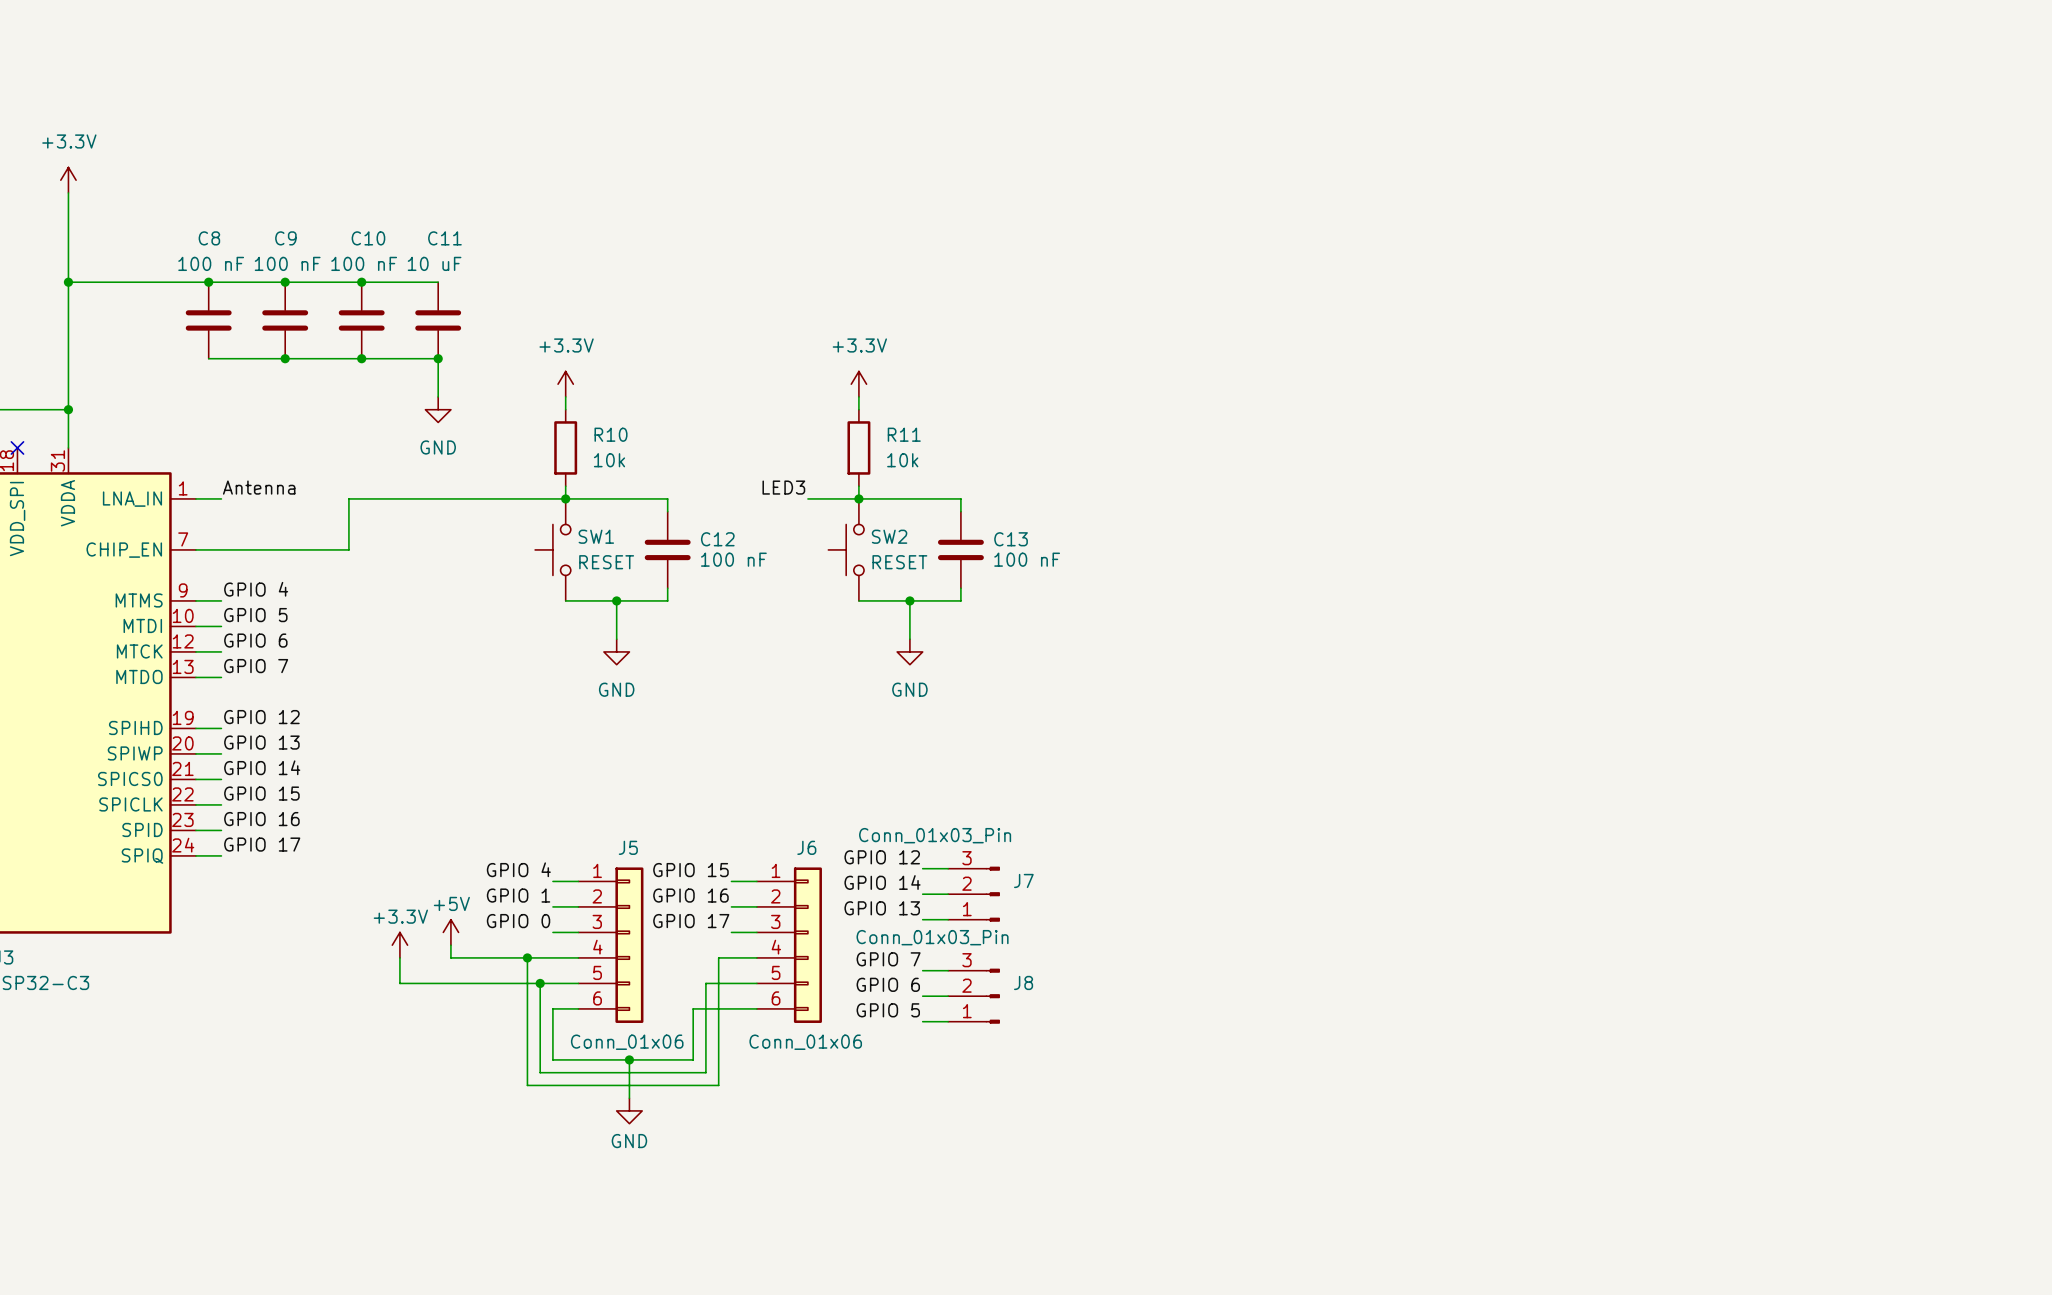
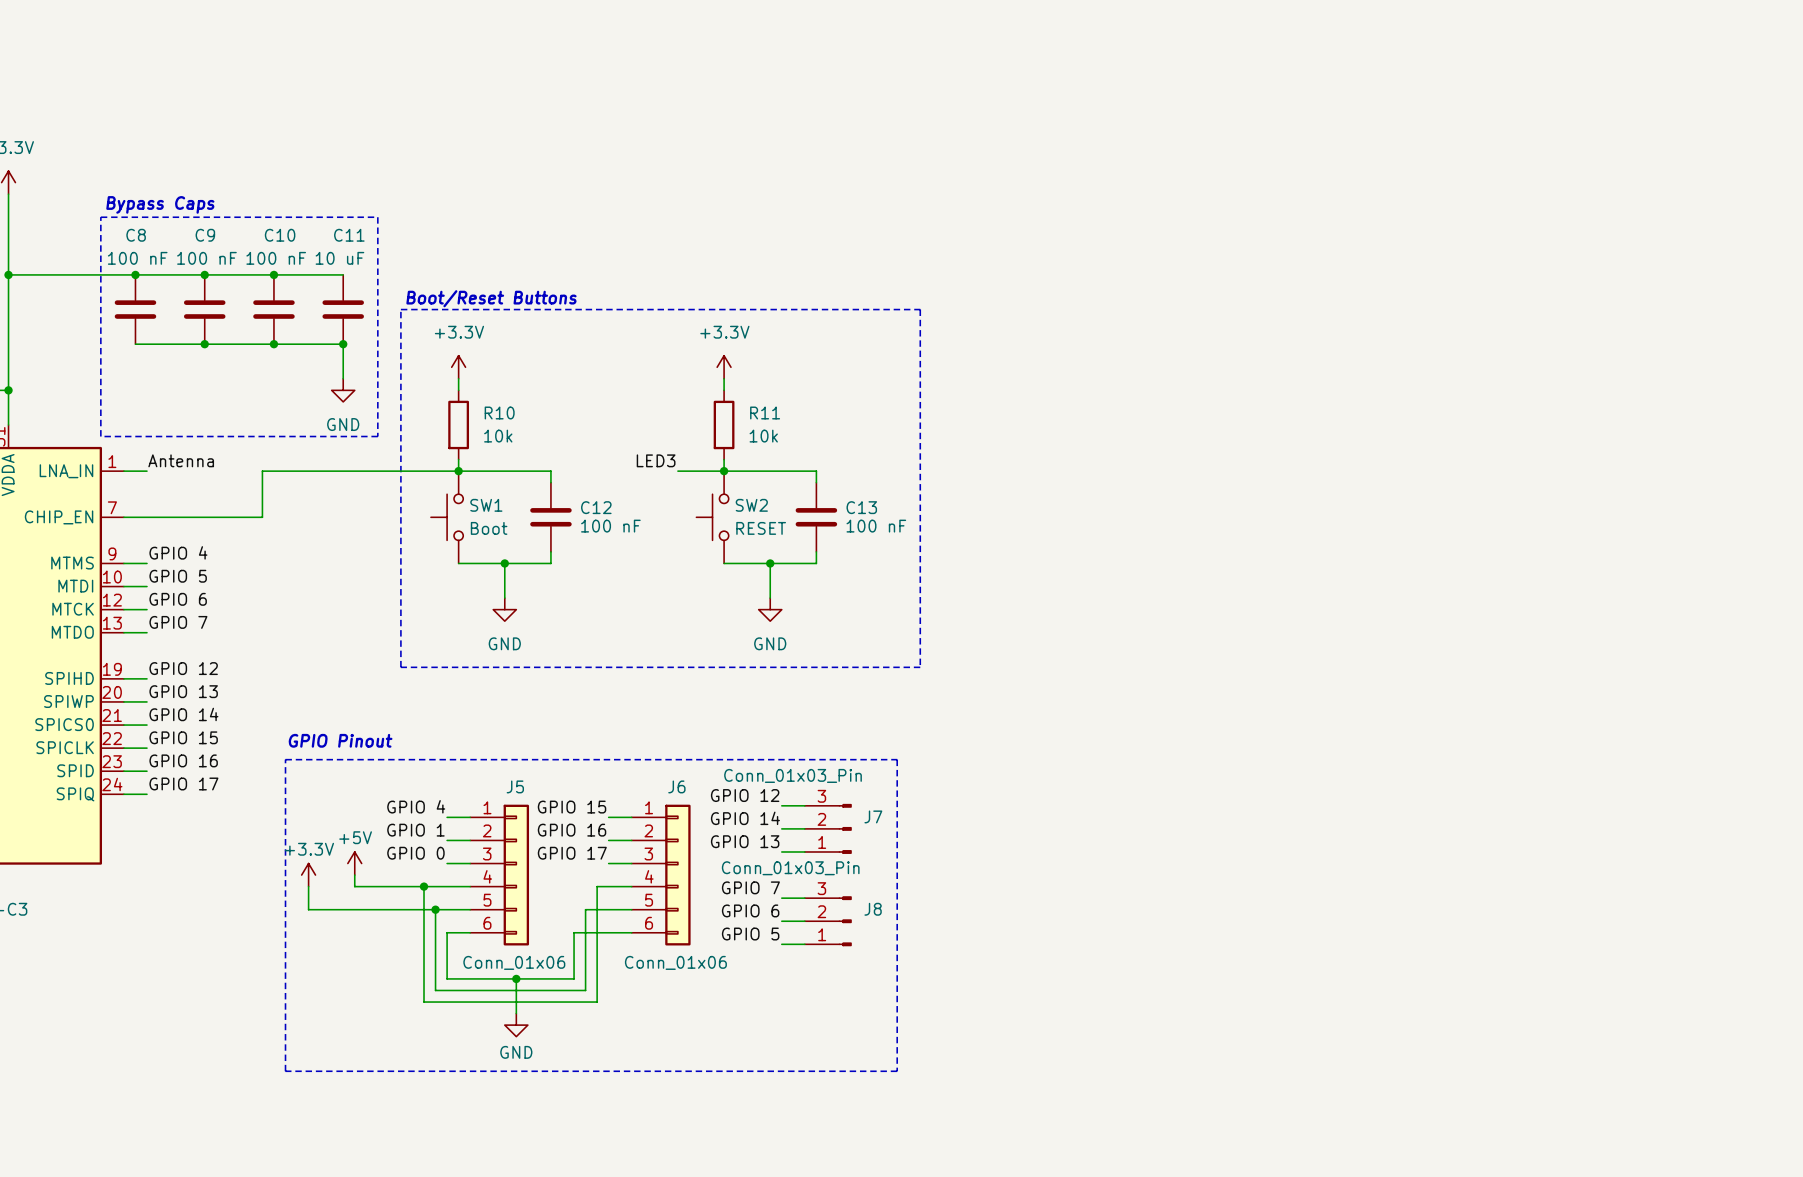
text: none -> Bypass Caps (160, 204)
line: none -> (100, 217) (377, 217) (377, 436) (100, 436) (100, 217)
text: none -> Boot/Reset Buttons (491, 298)
line: none -> (400, 309) (920, 309) (920, 667) (400, 667) (400, 309)
SW1 value: RESET (606, 562) -> Boot (489, 528)
text: none -> GPIO Pinout (340, 740)
line: none -> (285, 759) (897, 759) (897, 1071) (285, 1071) (285, 759)

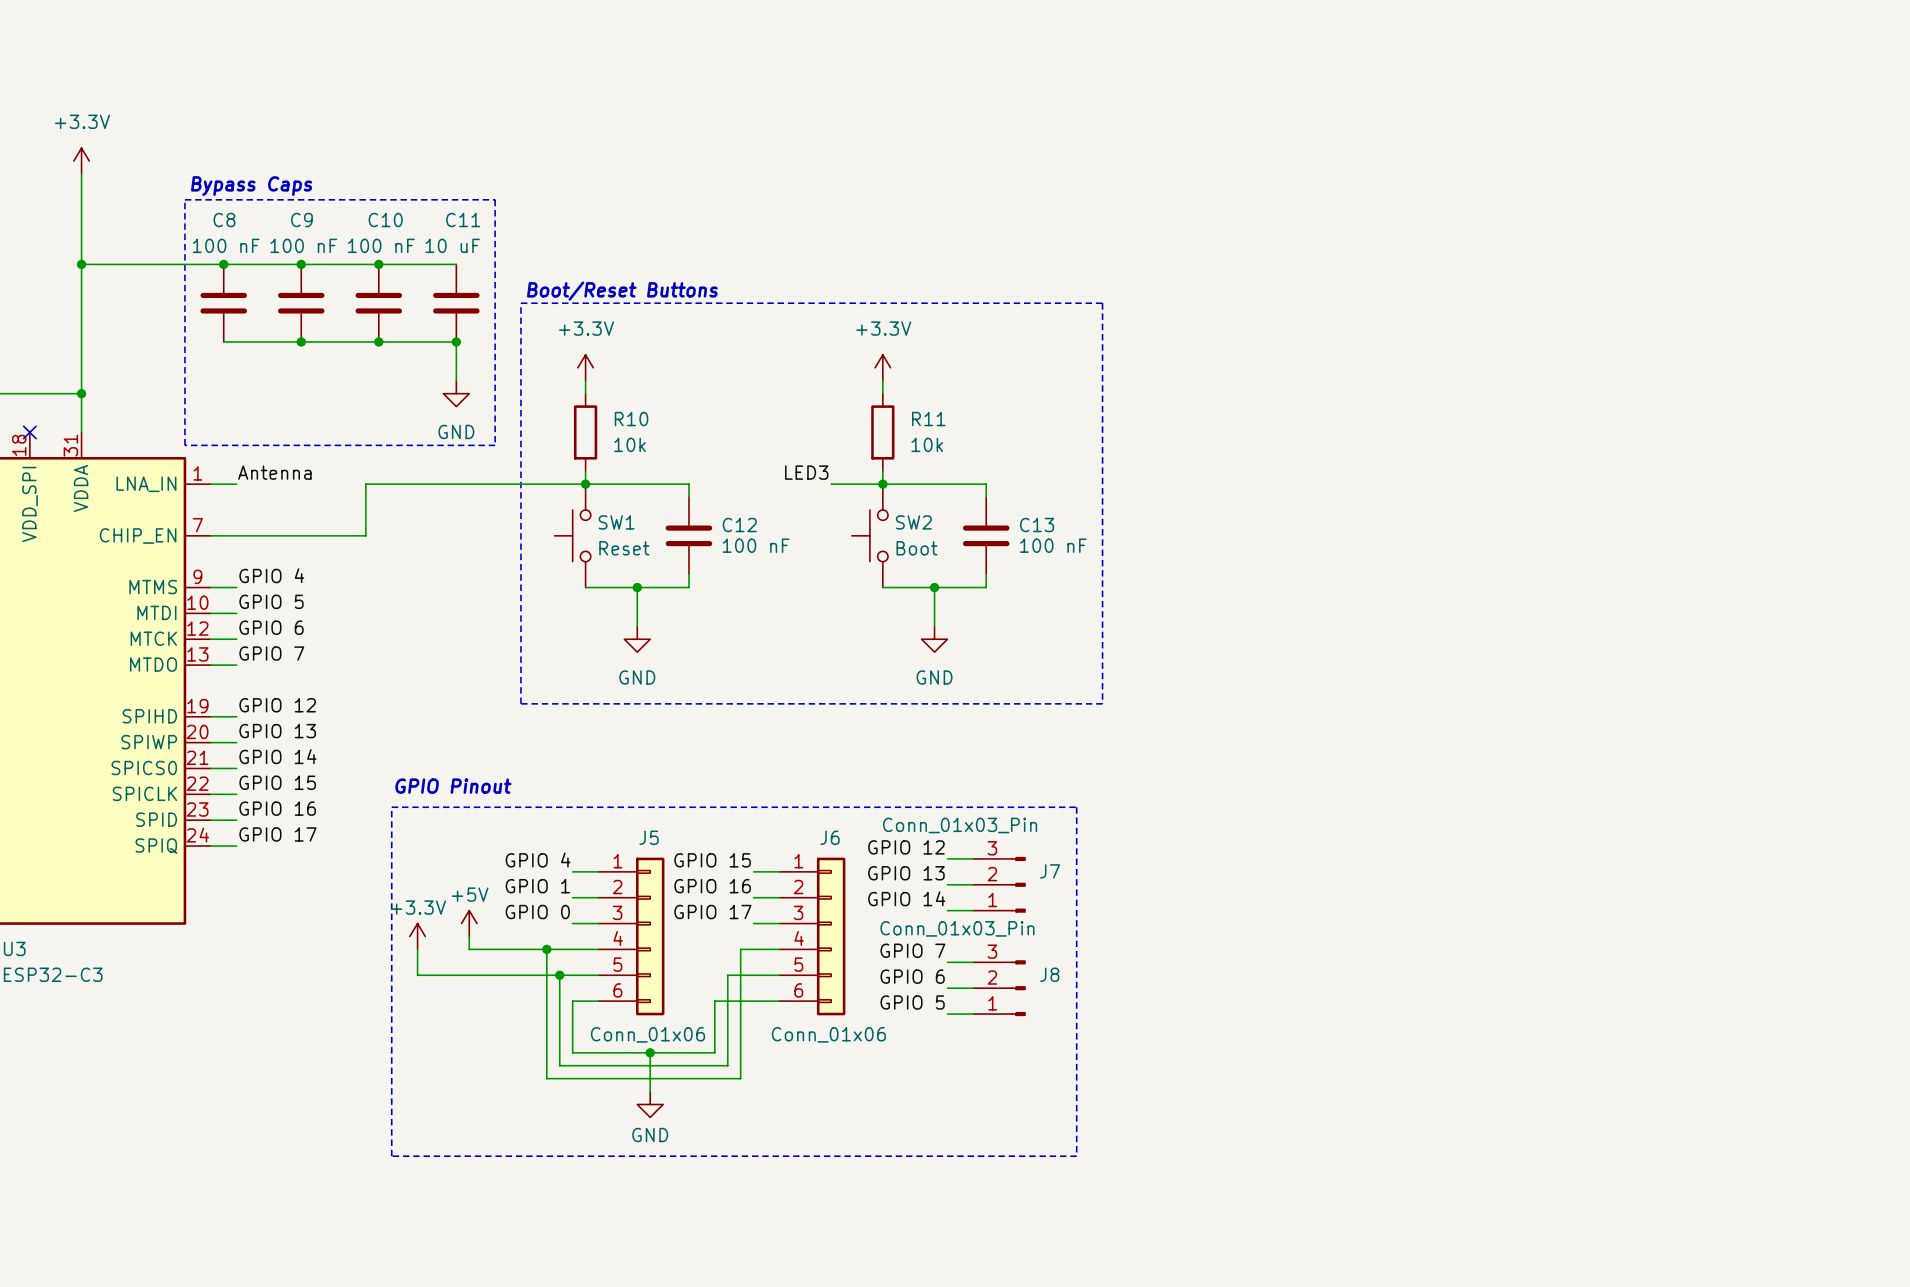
SW1 value: Boot (489, 528) -> Reset (624, 548)
SW2 value: RESET (761, 528) -> Boot (916, 548)
label: GPIO 14 (745, 818) -> GPIO 13 (906, 873)
label: GPIO 13 (745, 841) -> GPIO 14 (906, 898)

